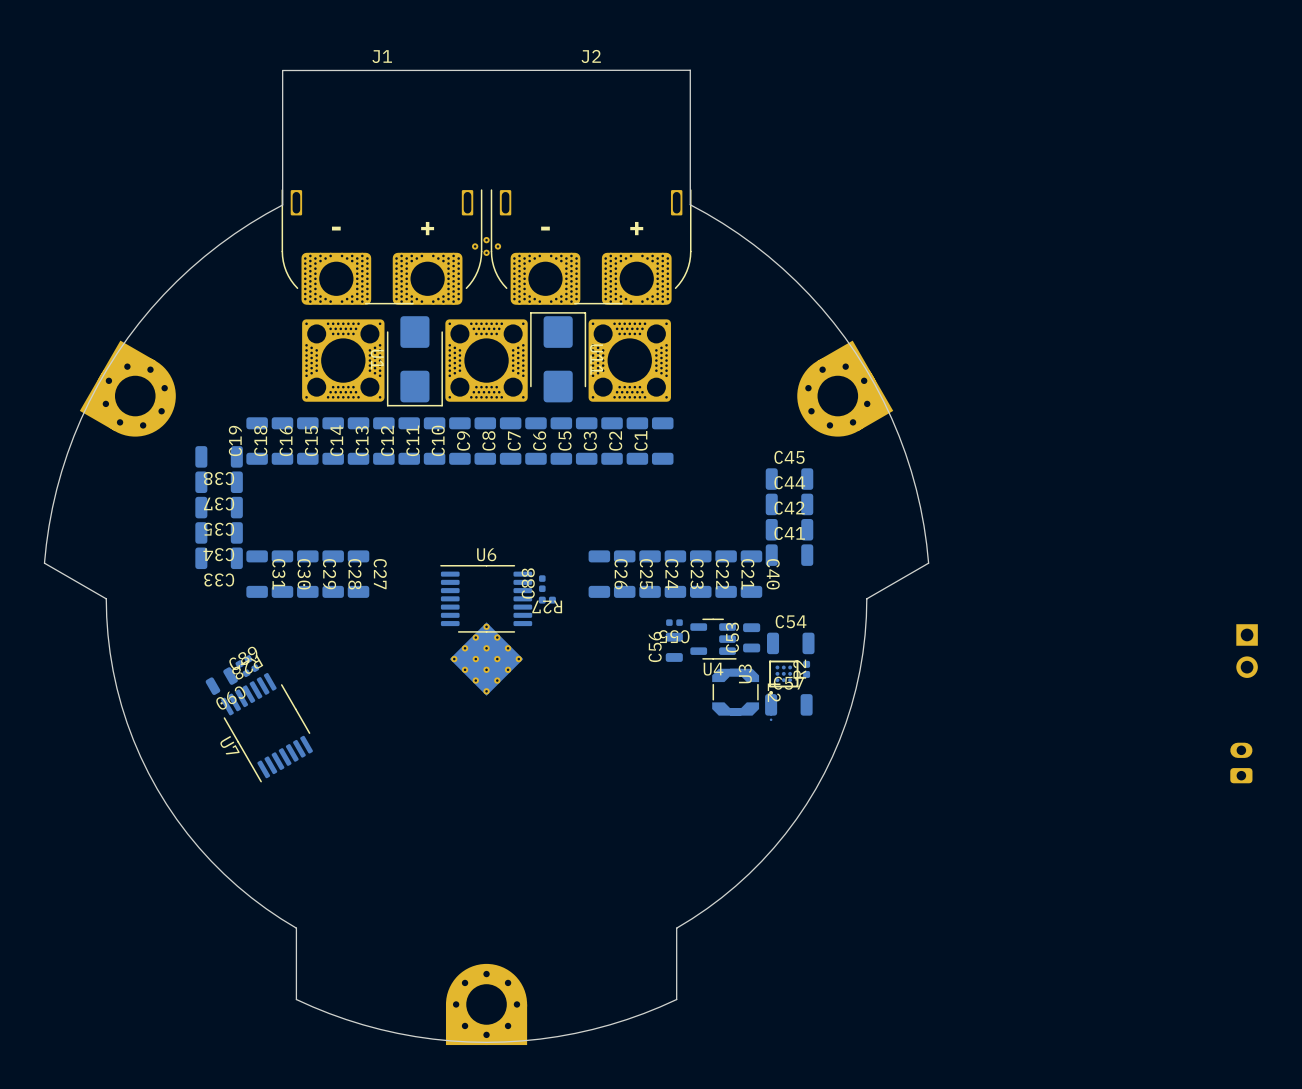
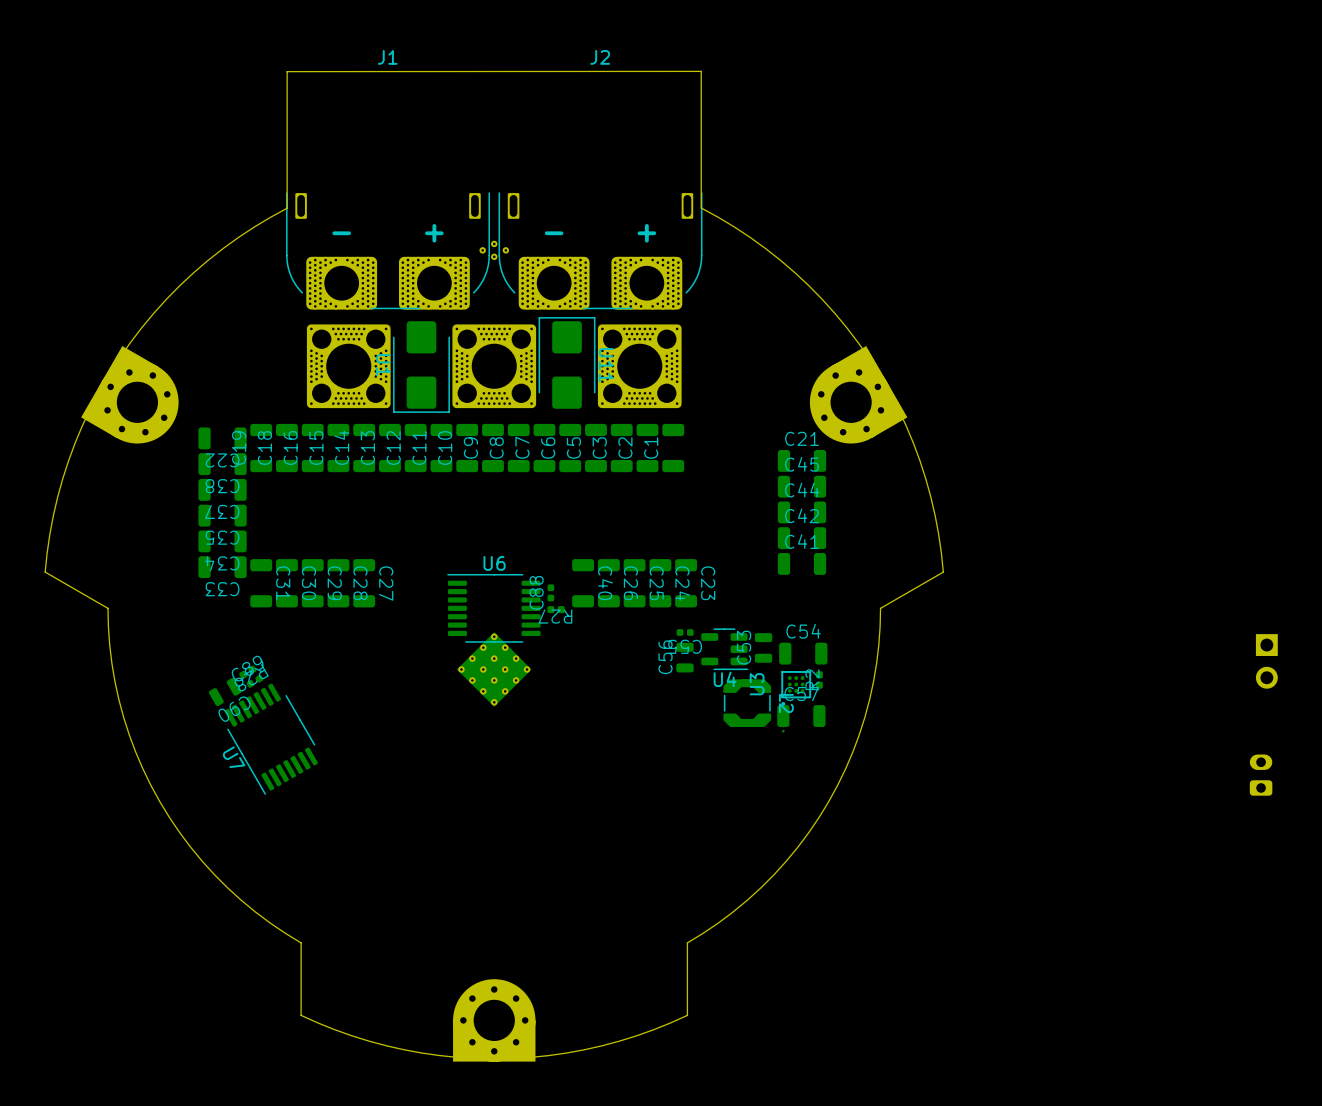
C22 rotation: 0° (700, 574) -> 90° clockwise (222, 438)
C22 position: (700, 574) -> (222, 438)
C21 rotation: 0° (726, 574) -> 90° clockwise (802, 460)
C21 position: (726, 574) -> (802, 460)
C21 name position: C21 (747, 574) -> C21 (802, 438)
C40 position: (751, 574) -> (583, 583)

